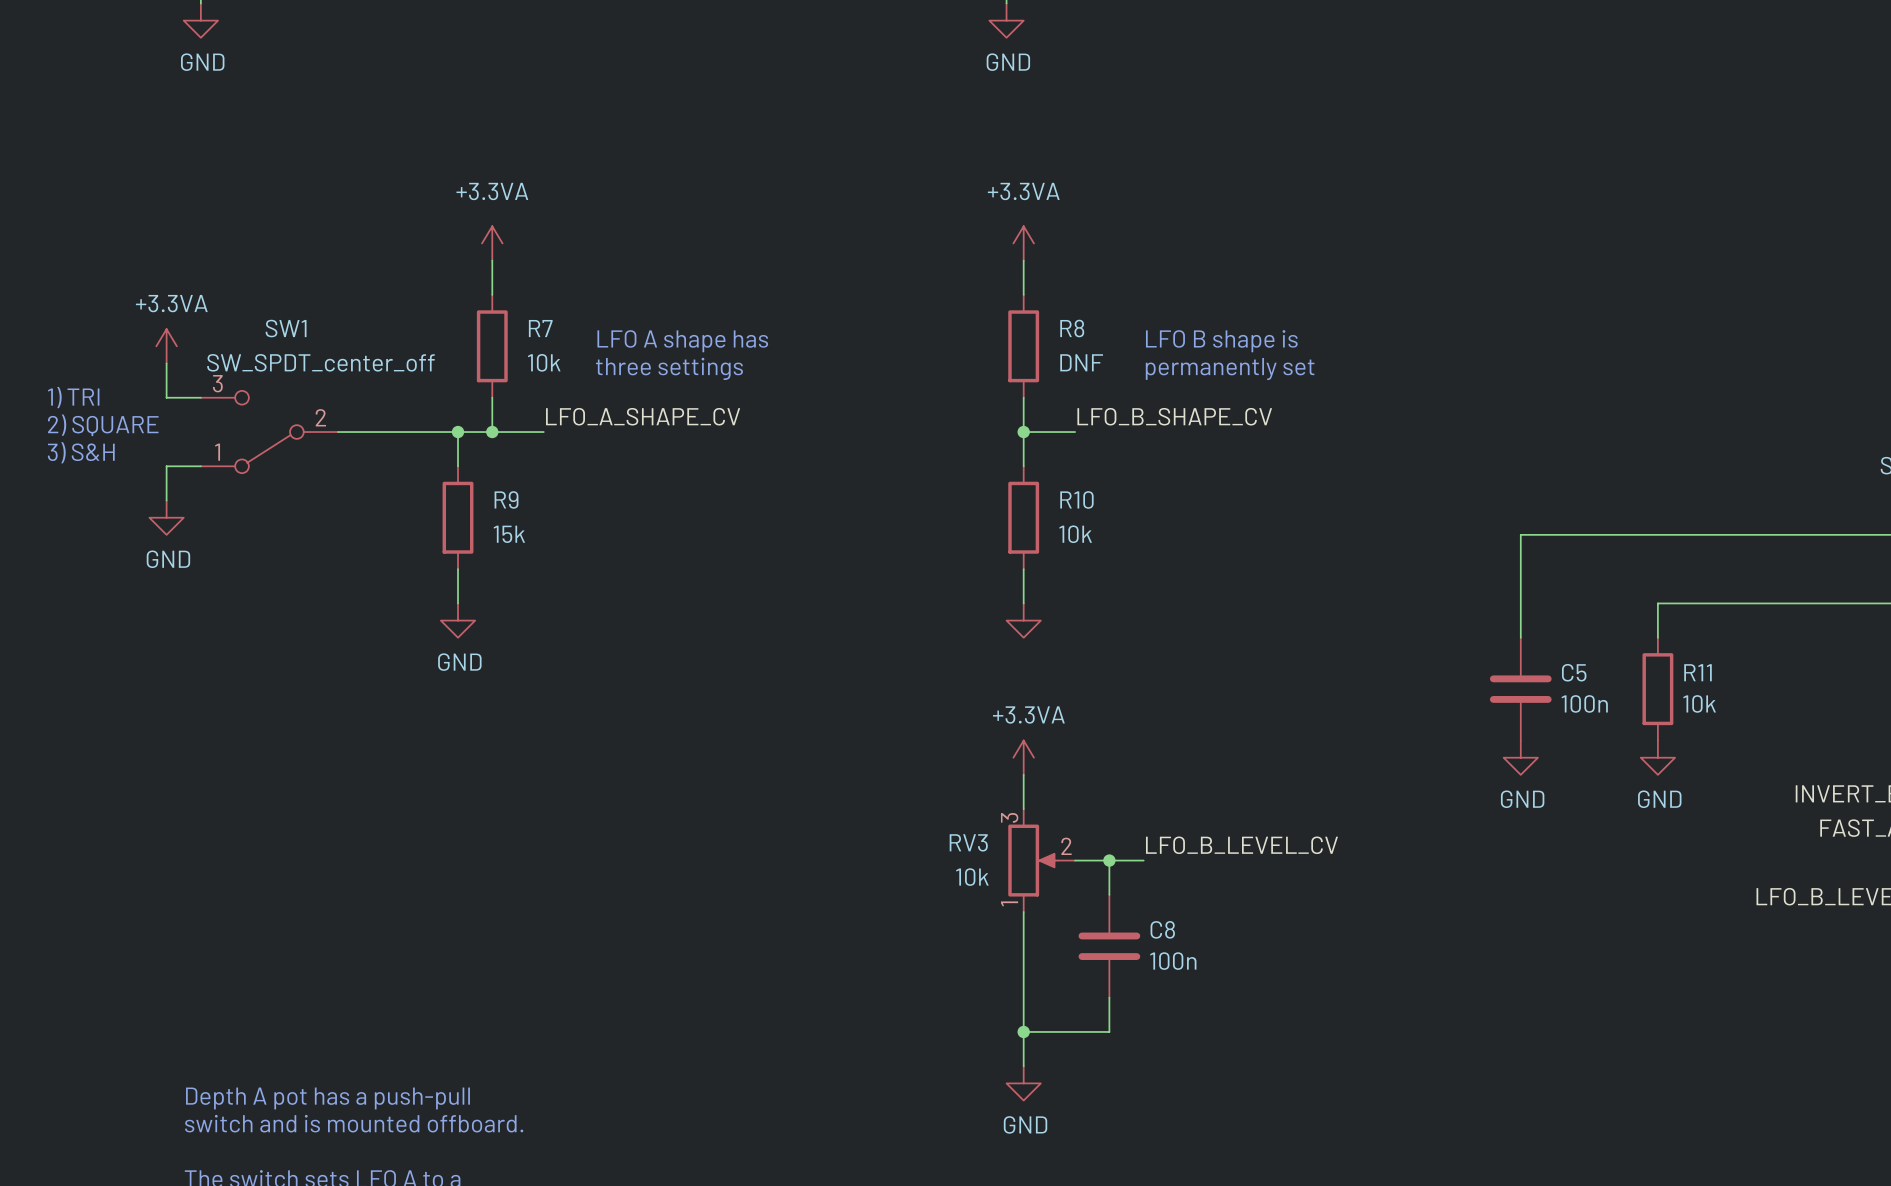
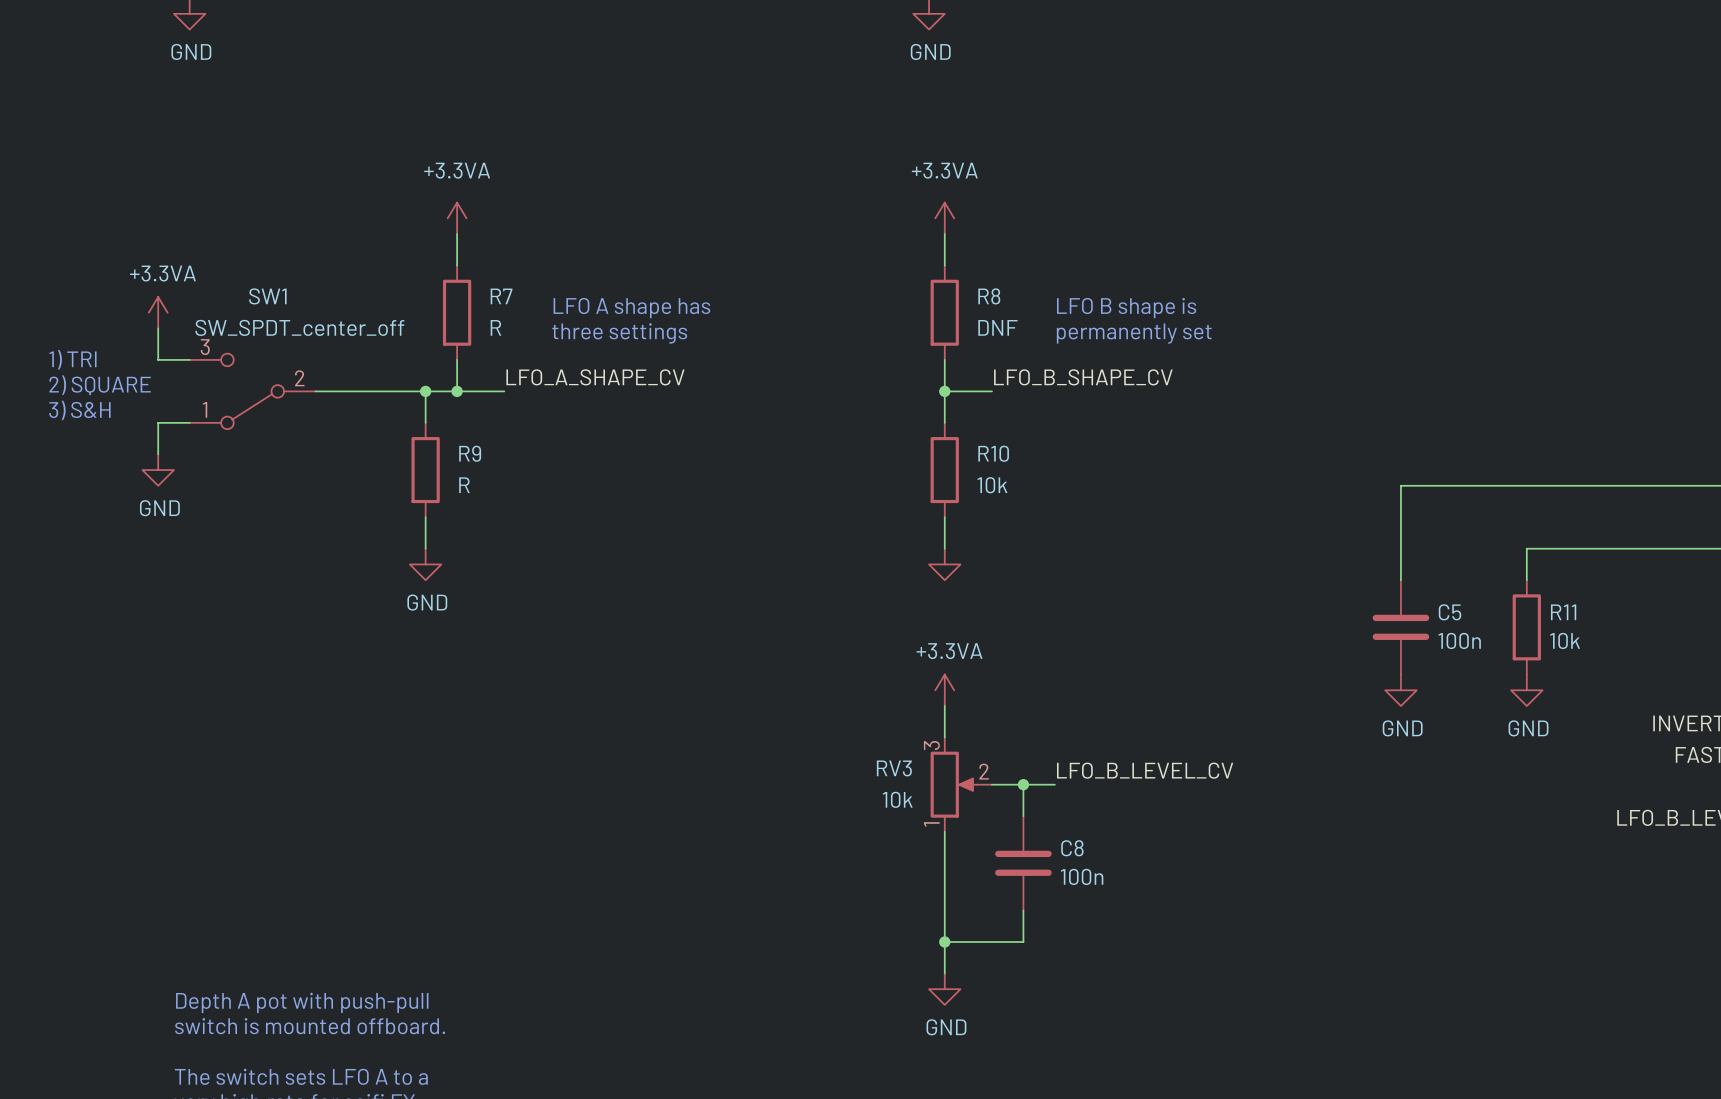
R7 value: 10k (544, 362) -> R (495, 327)
R9 value: 15k (509, 534) -> R (464, 485)
text: Depth A pot has a push-pull (327, 1098) -> Depth A pot with push-pull (302, 1002)
text: switch and is mounted offboard. (354, 1123) -> switch is mounted offboard. (310, 1026)

